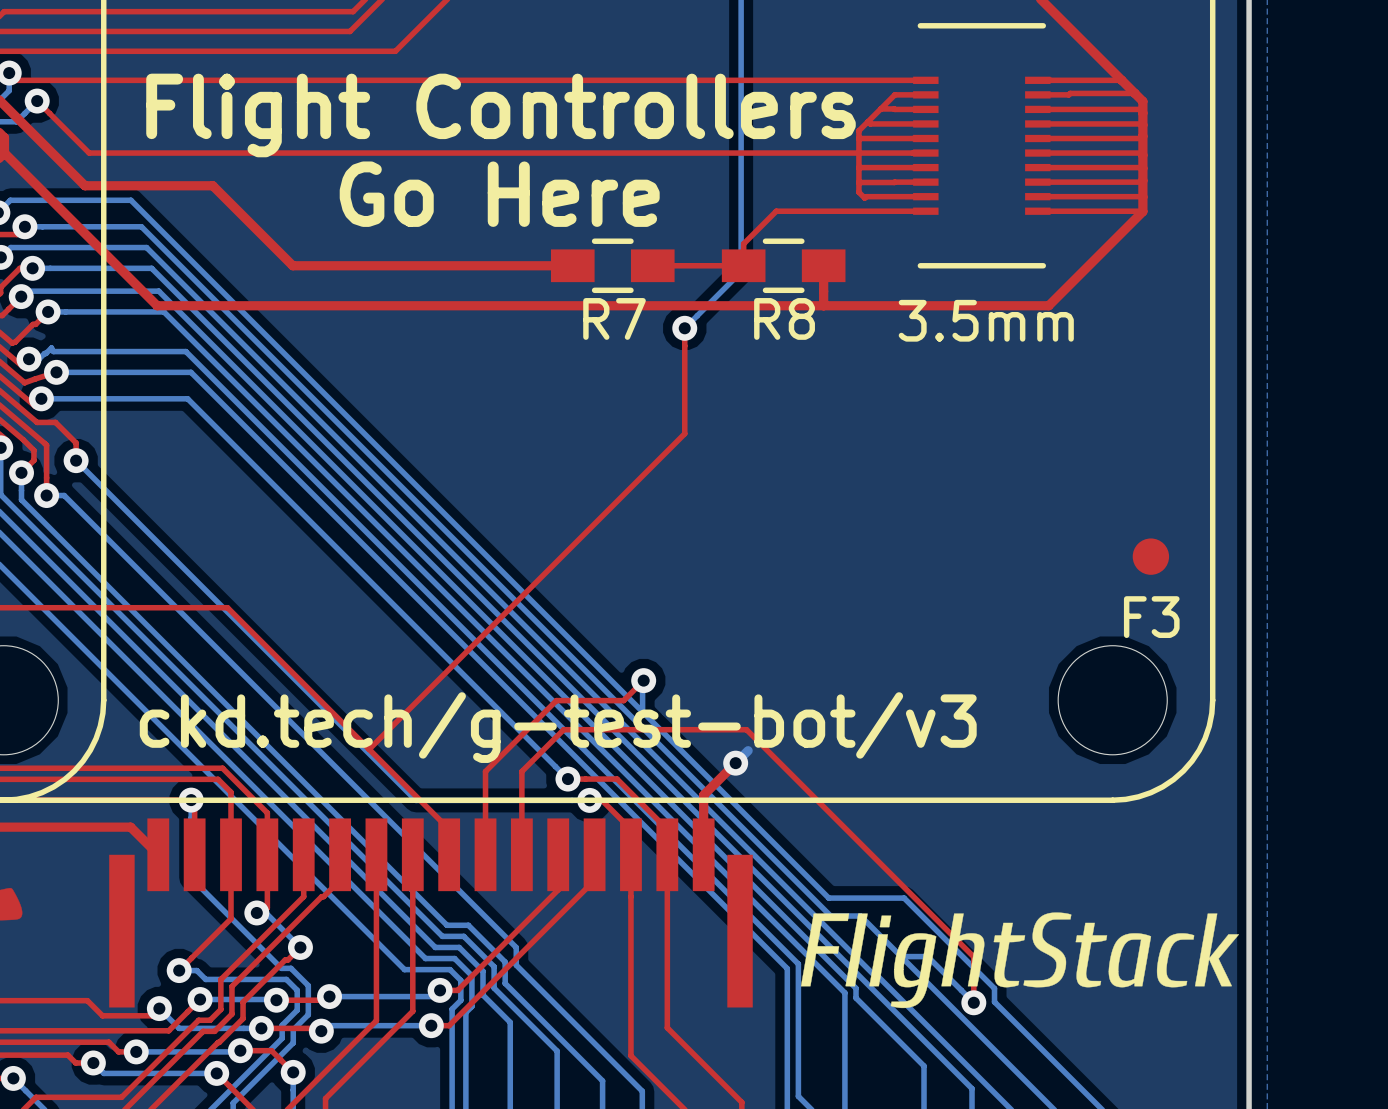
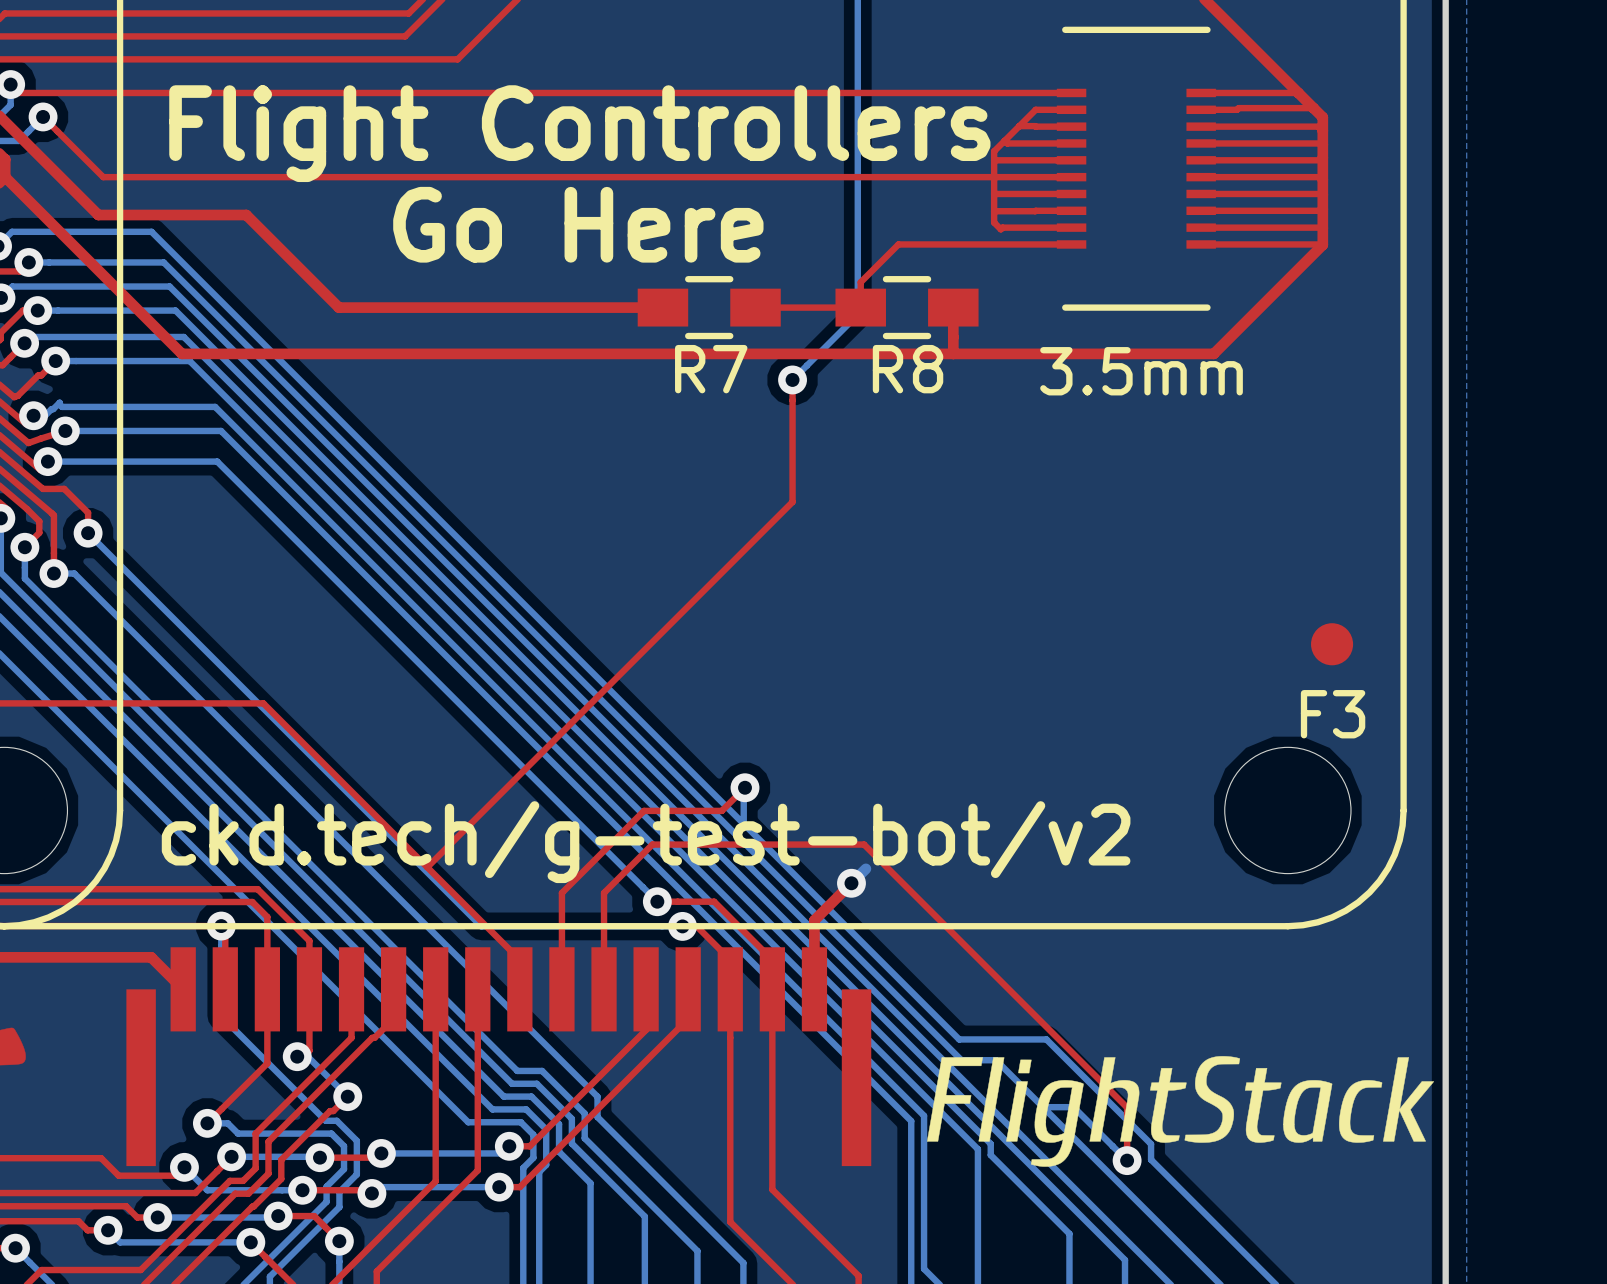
text: ckd.tech/g-test-bot/v3 (558, 727) -> ckd.tech/g-test-bot/v2 (646, 842)

